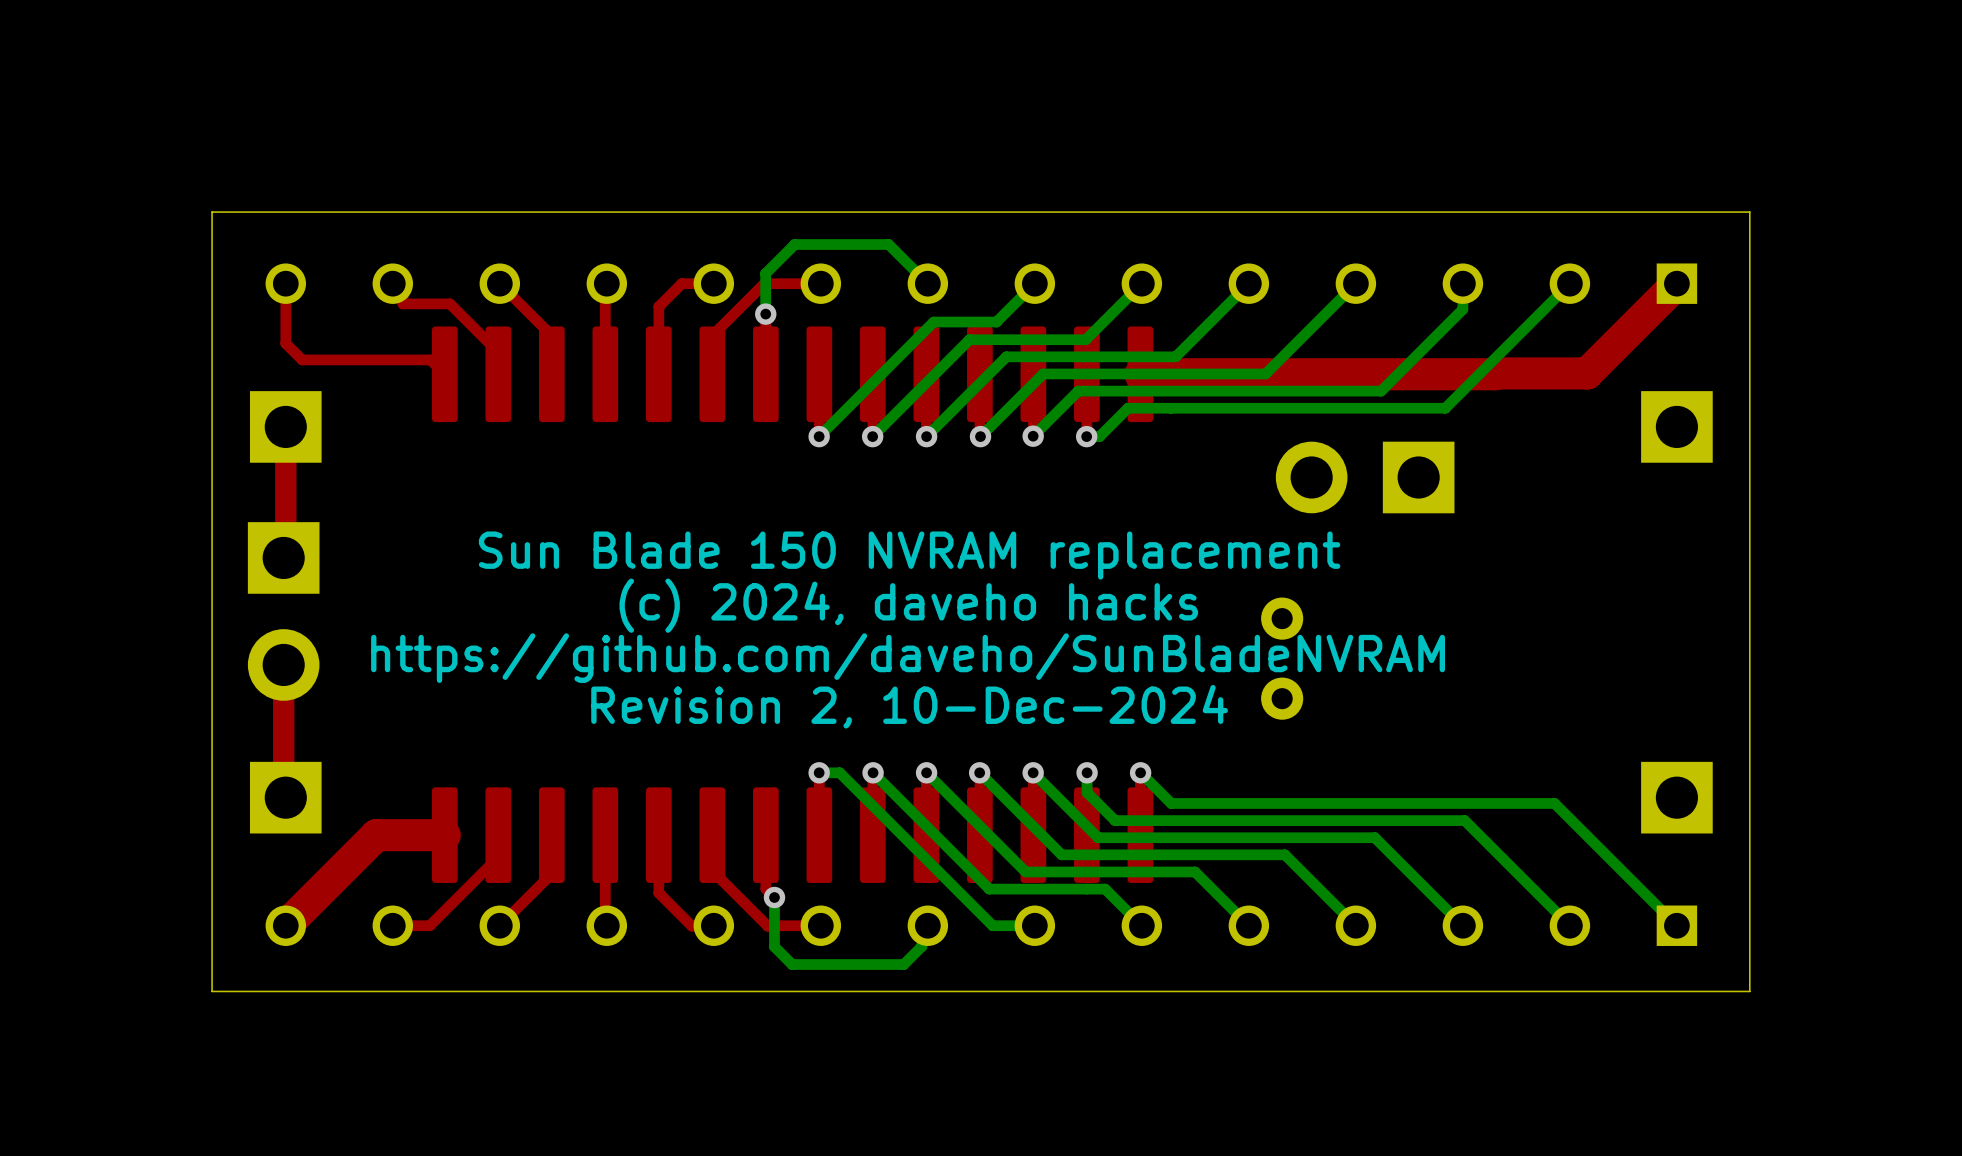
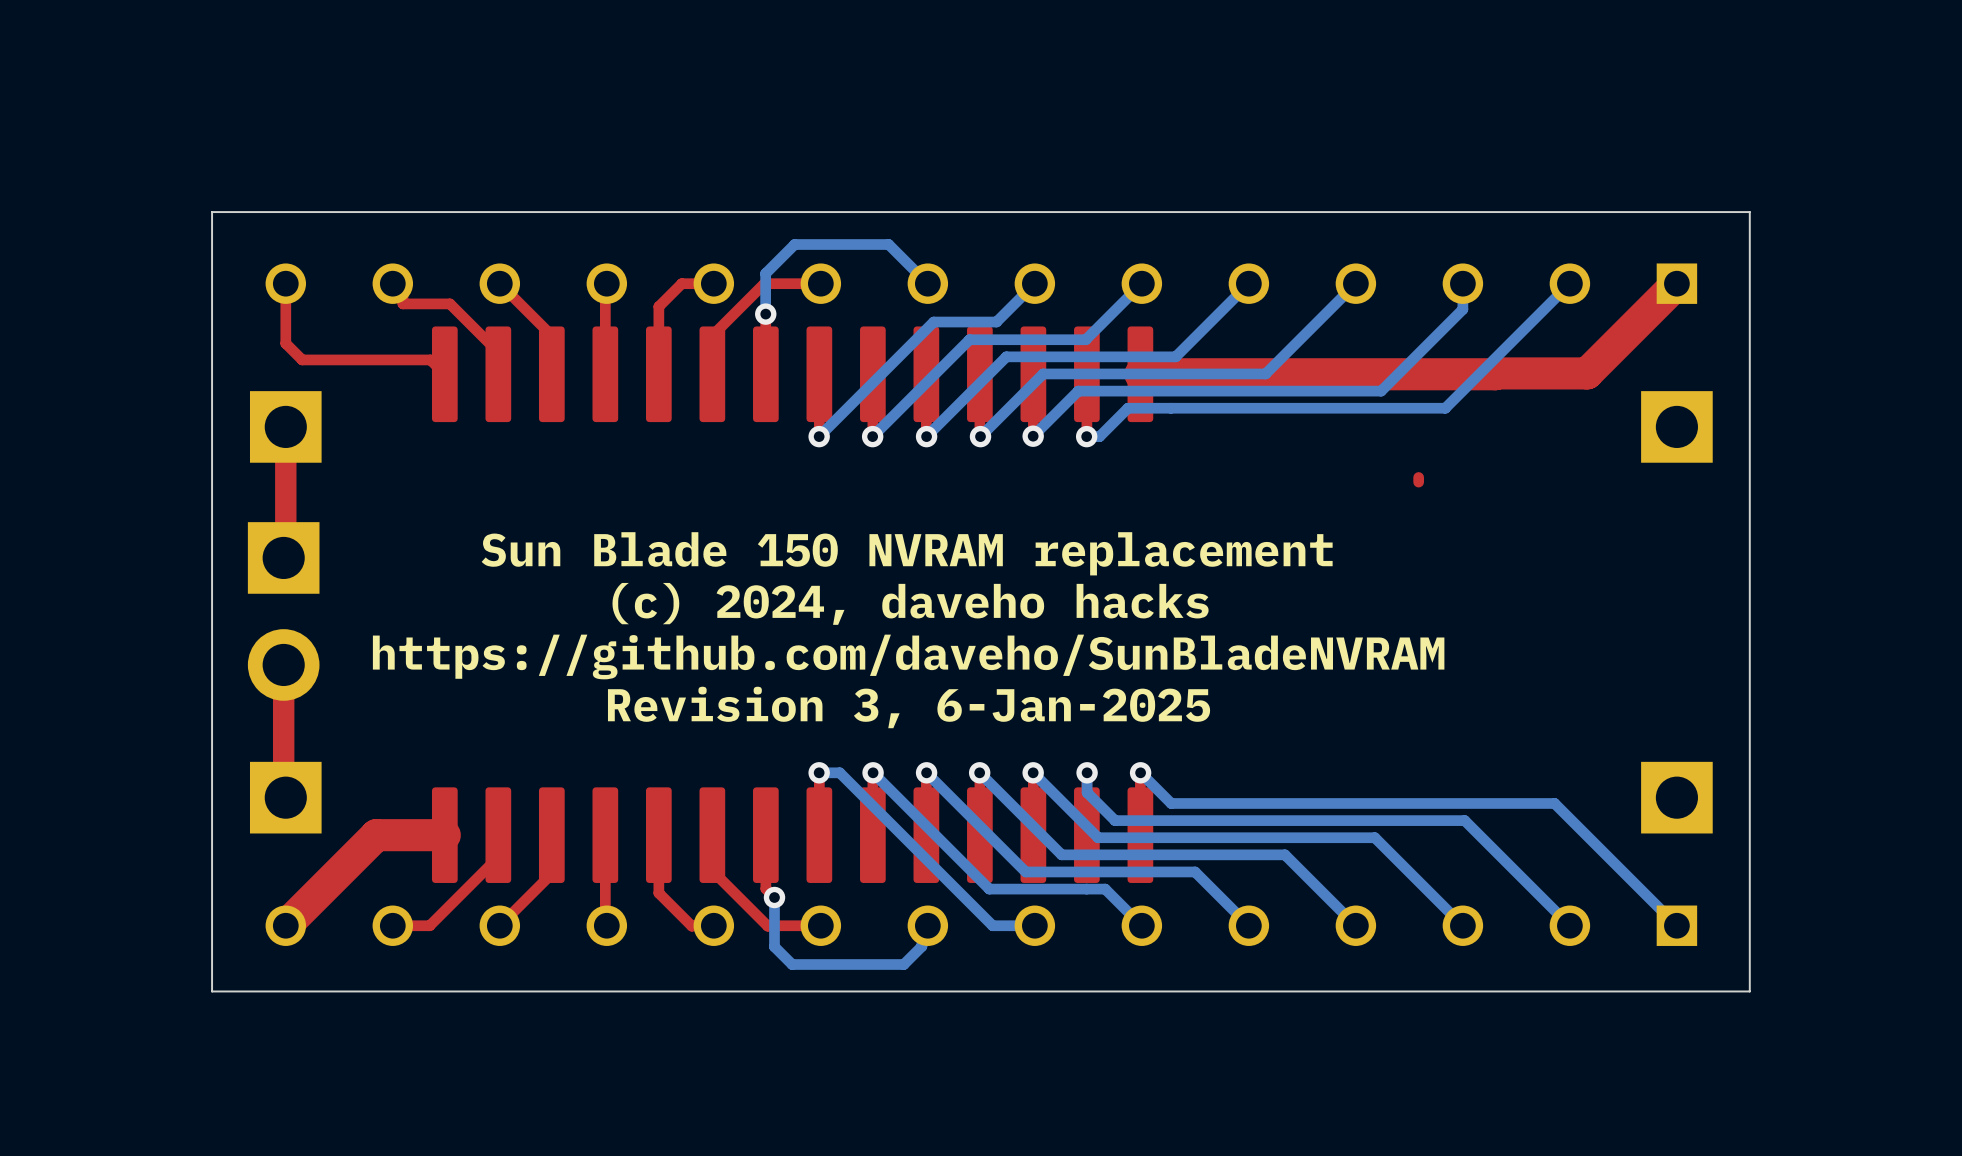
part: (1365, 477) -> none
part: (1282, 658) -> none
text: Revision 2, 10-Dec-2024 (909, 706) -> Revision 3, 6-Jan-2025 (909, 707)

